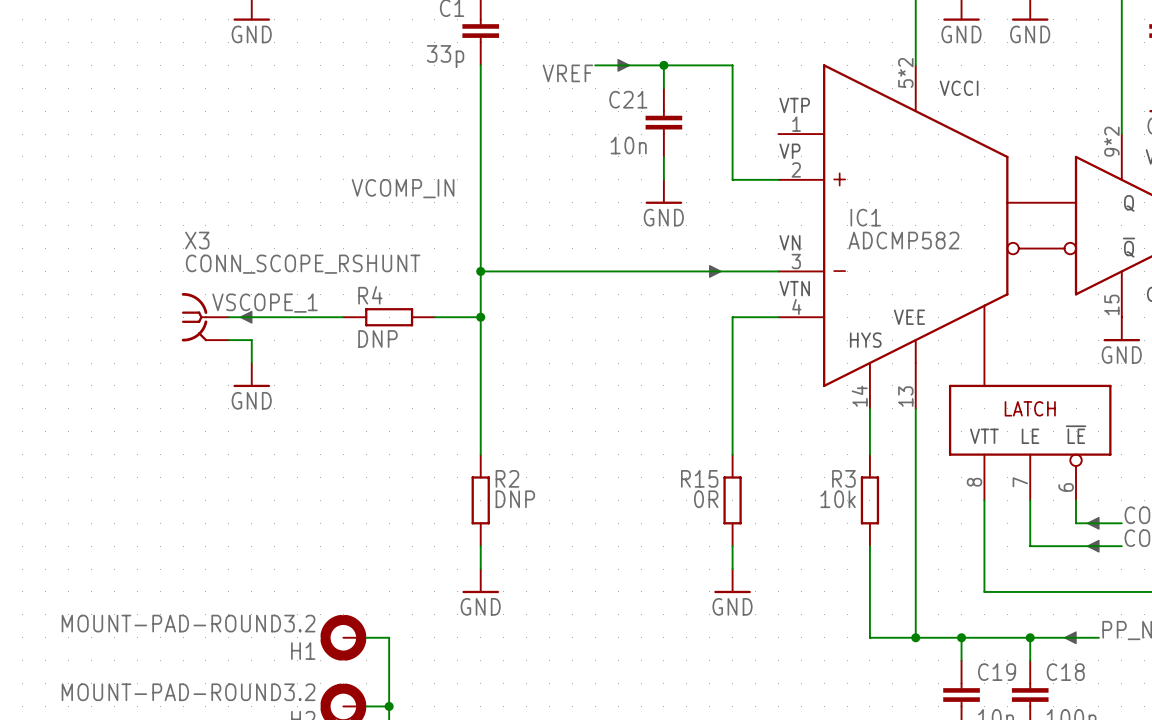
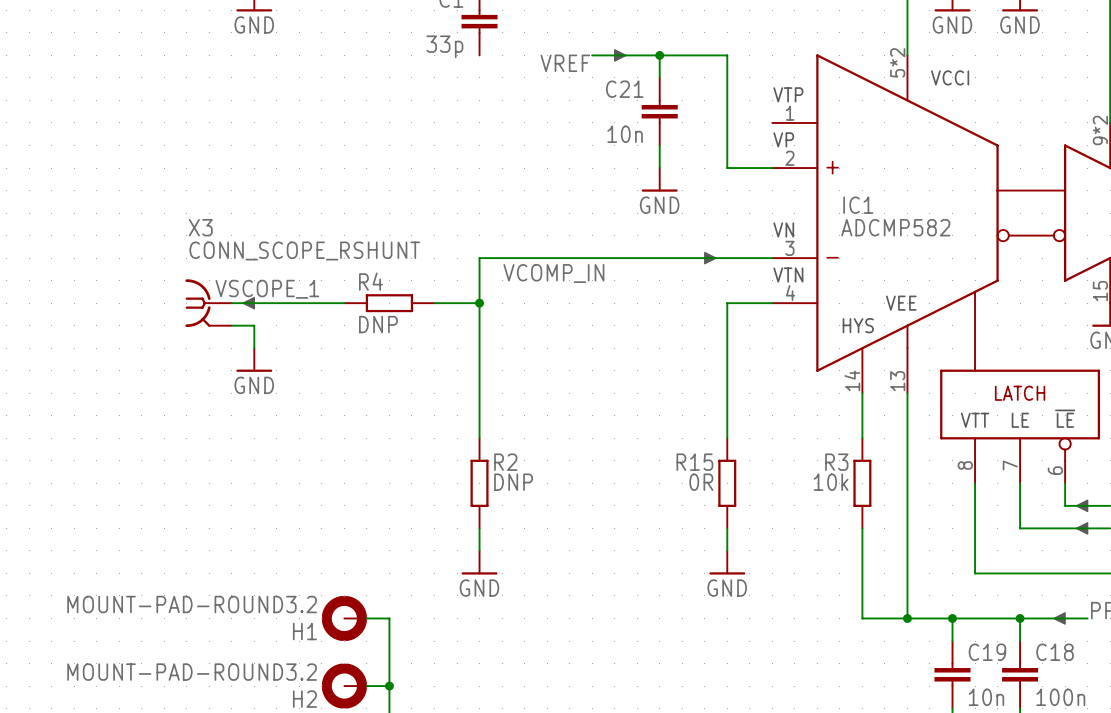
wire: (480, 65) (480, 271) -> none
label position: VCOMP_IN (403, 188) -> VCOMP_IN (553, 273)
junction: (480, 271) -> none

